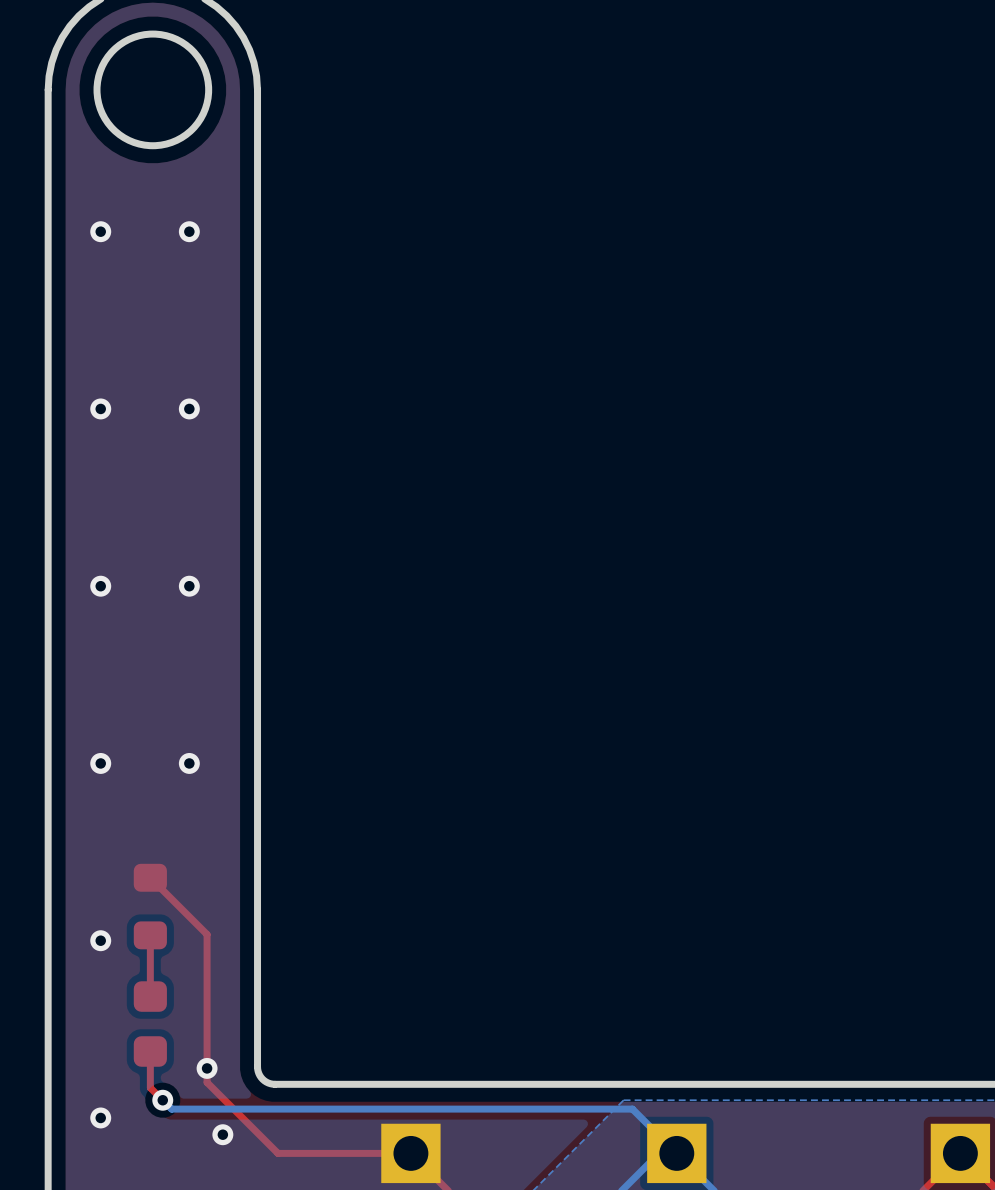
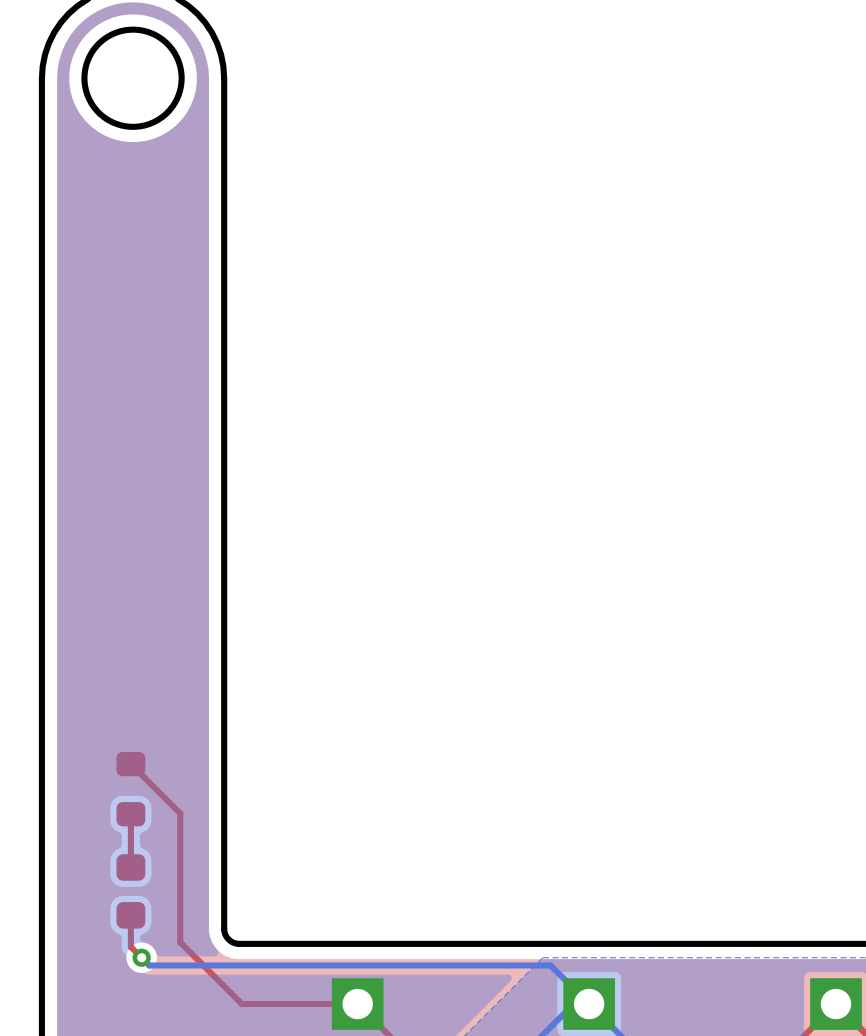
via: (100, 231) -> none
via: (189, 231) -> none
via: (100, 408) -> none
via: (189, 408) -> none
via: (100, 586) -> none
via: (189, 586) -> none
via: (100, 763) -> none
via: (189, 763) -> none
via: (100, 940) -> none
via: (207, 1068) -> none
via: (100, 1117) -> none
via: (222, 1134) -> none

